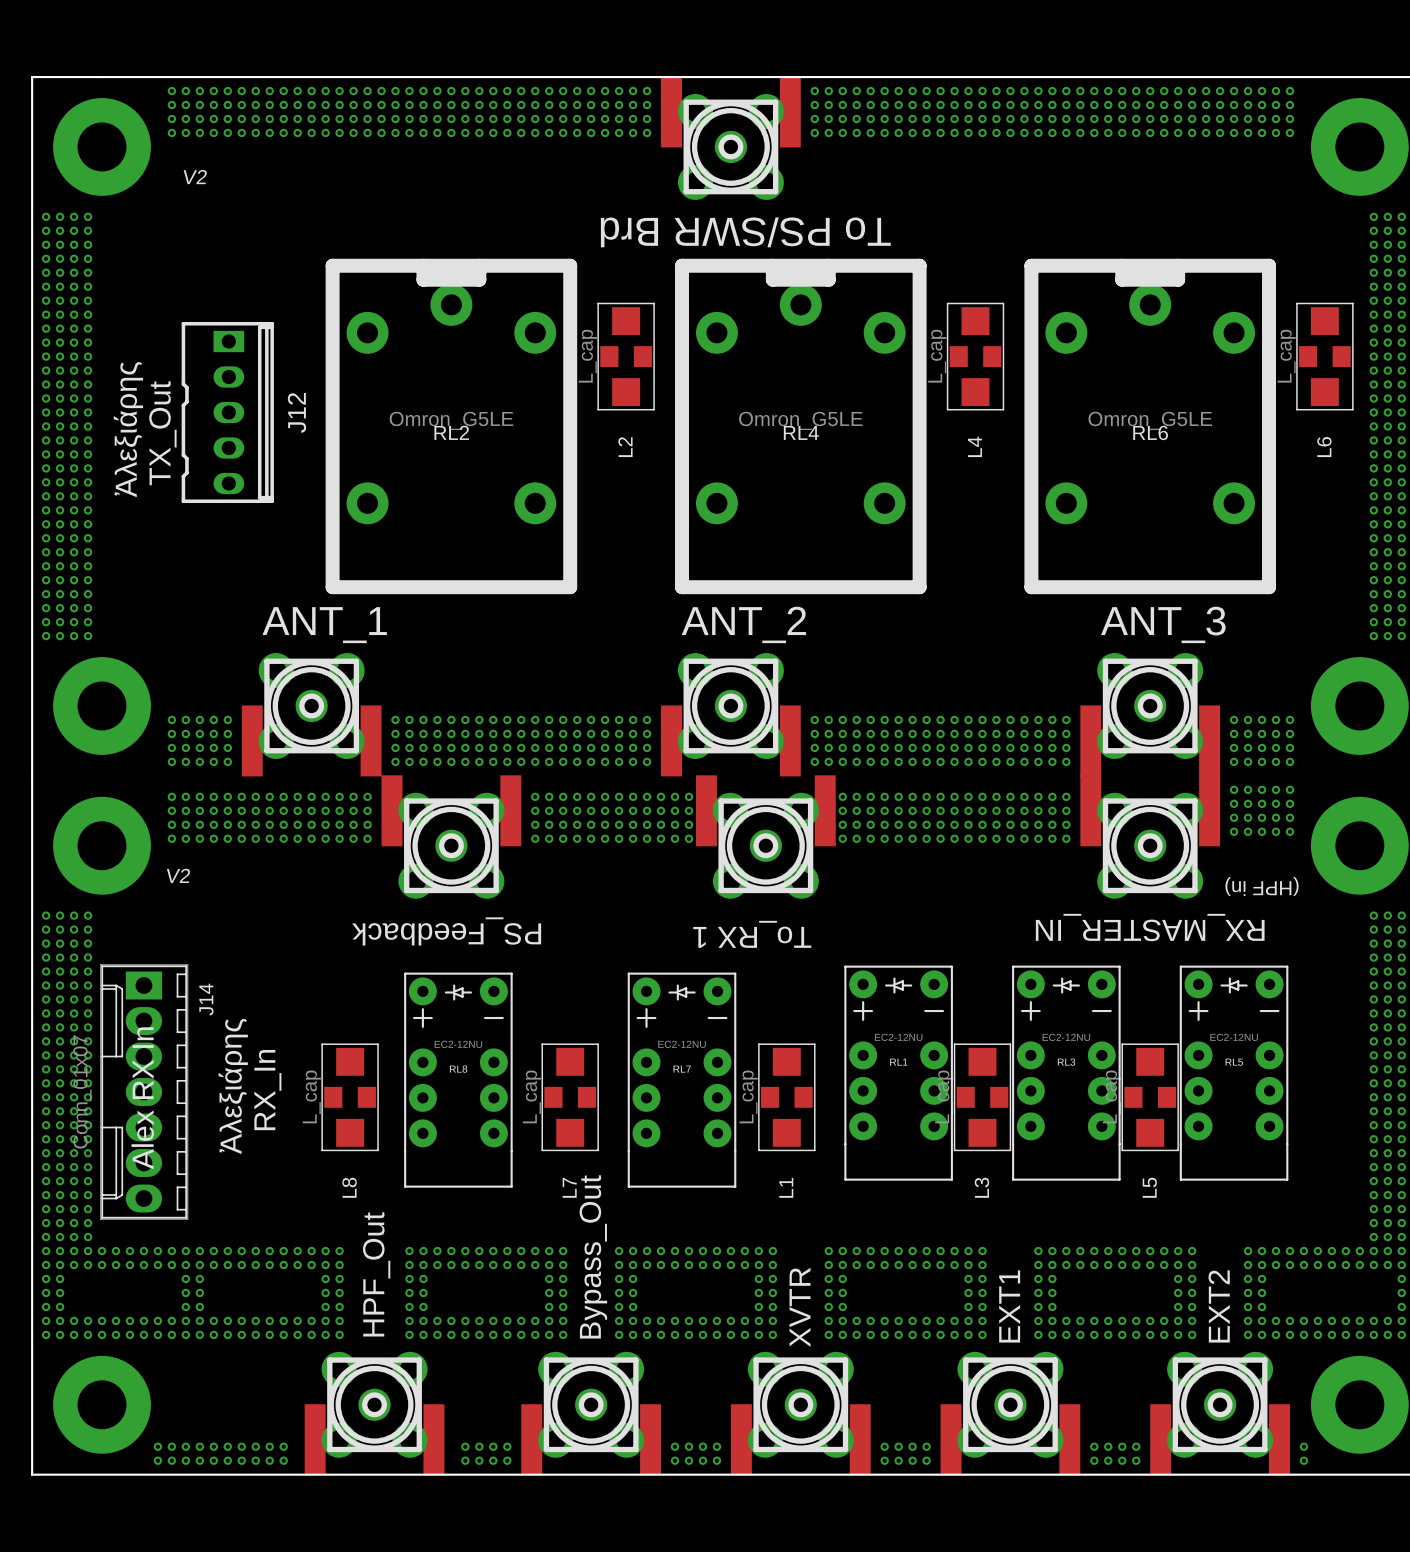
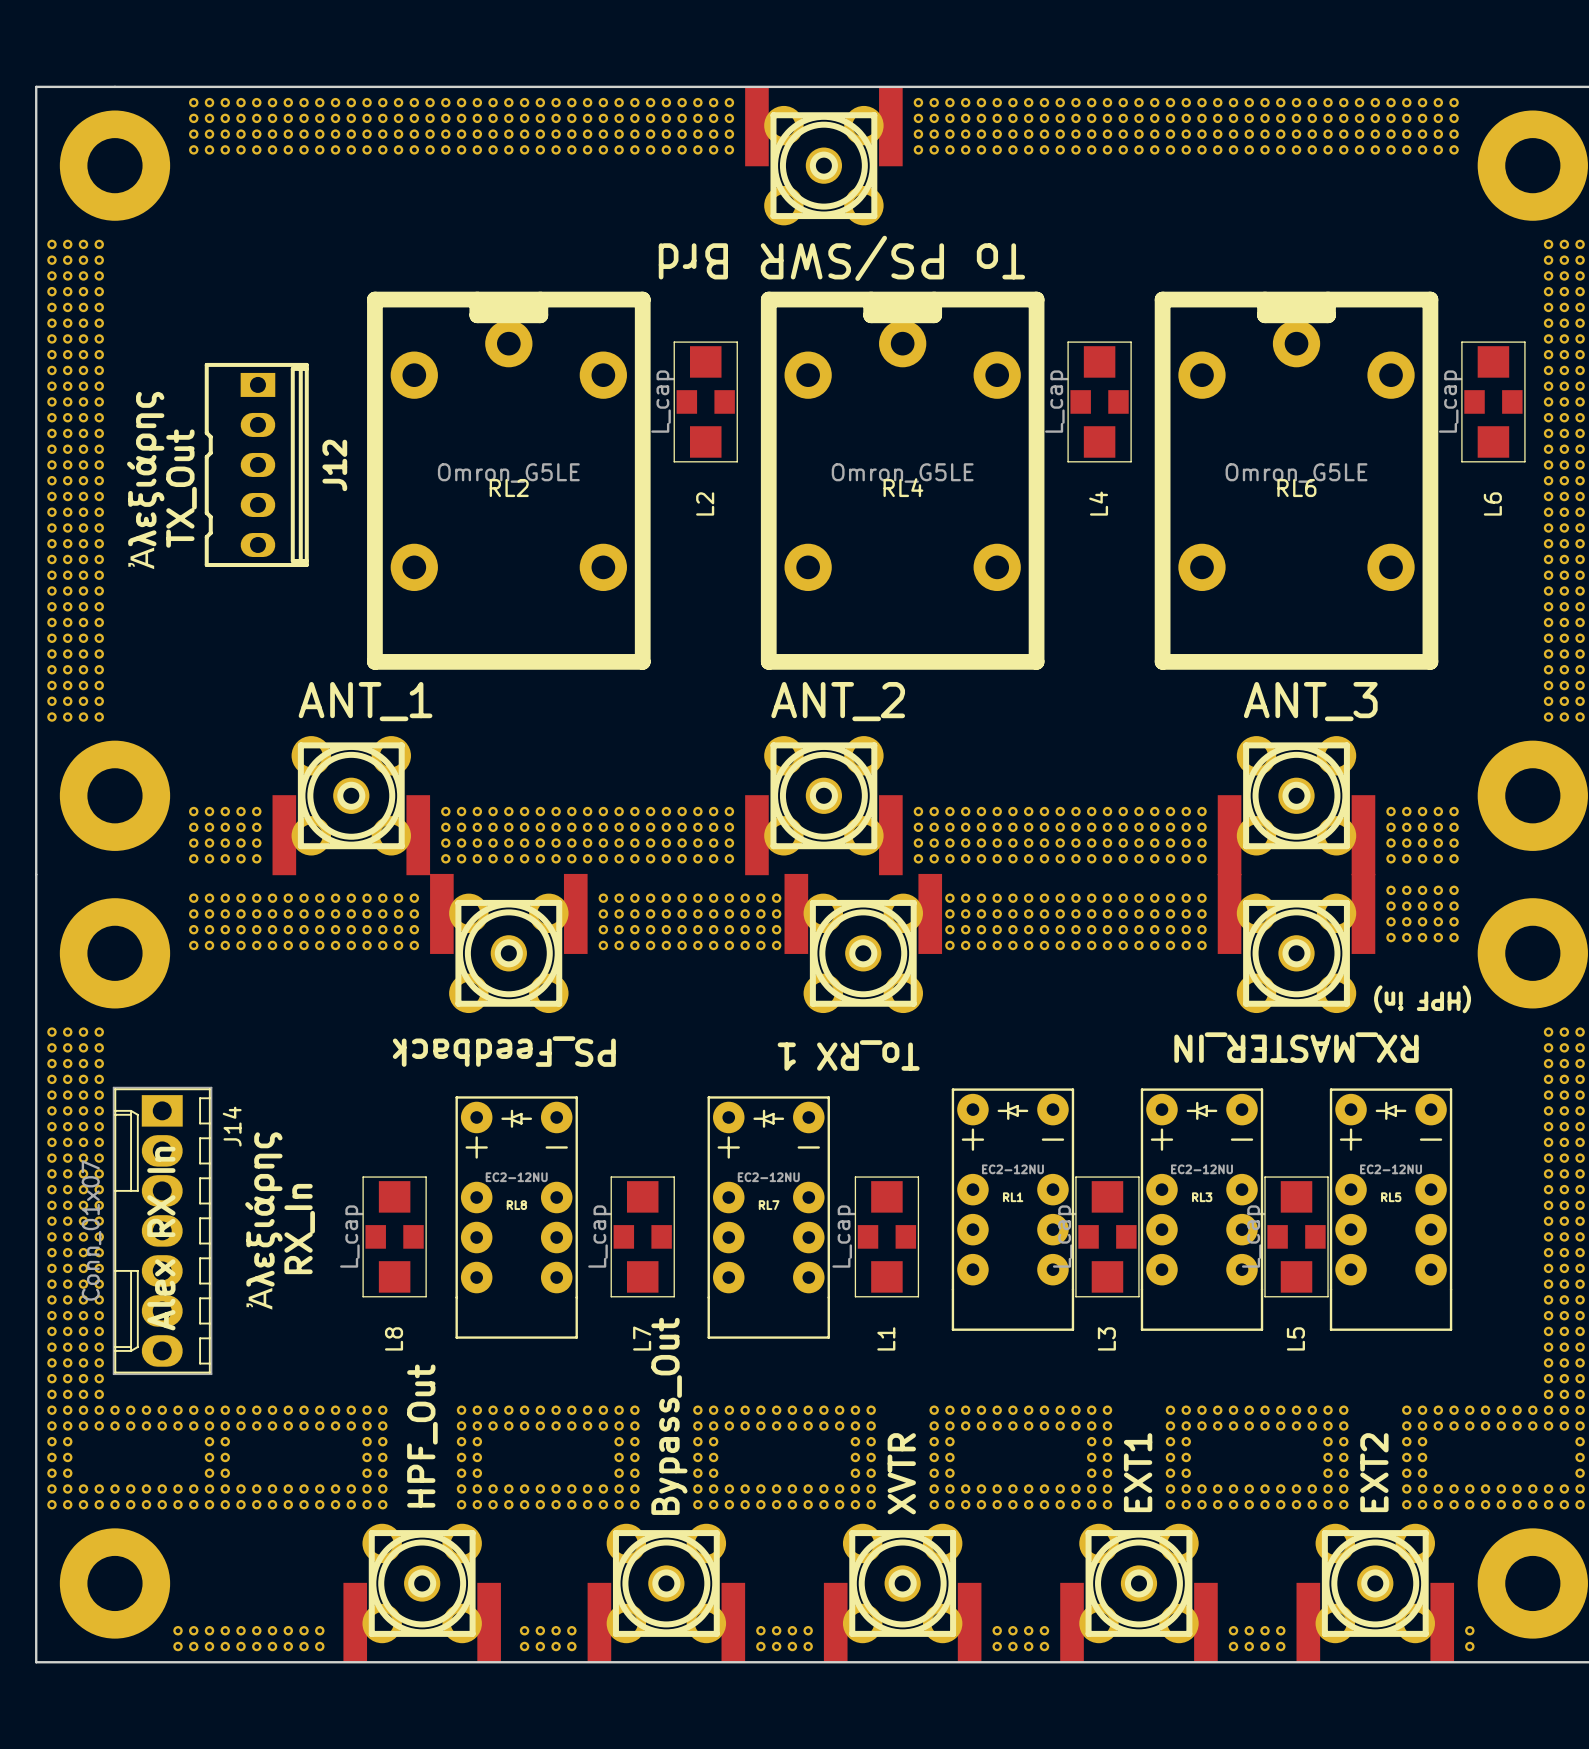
text: V2 (195, 177) -> none
text: V2 (178, 875) -> none

